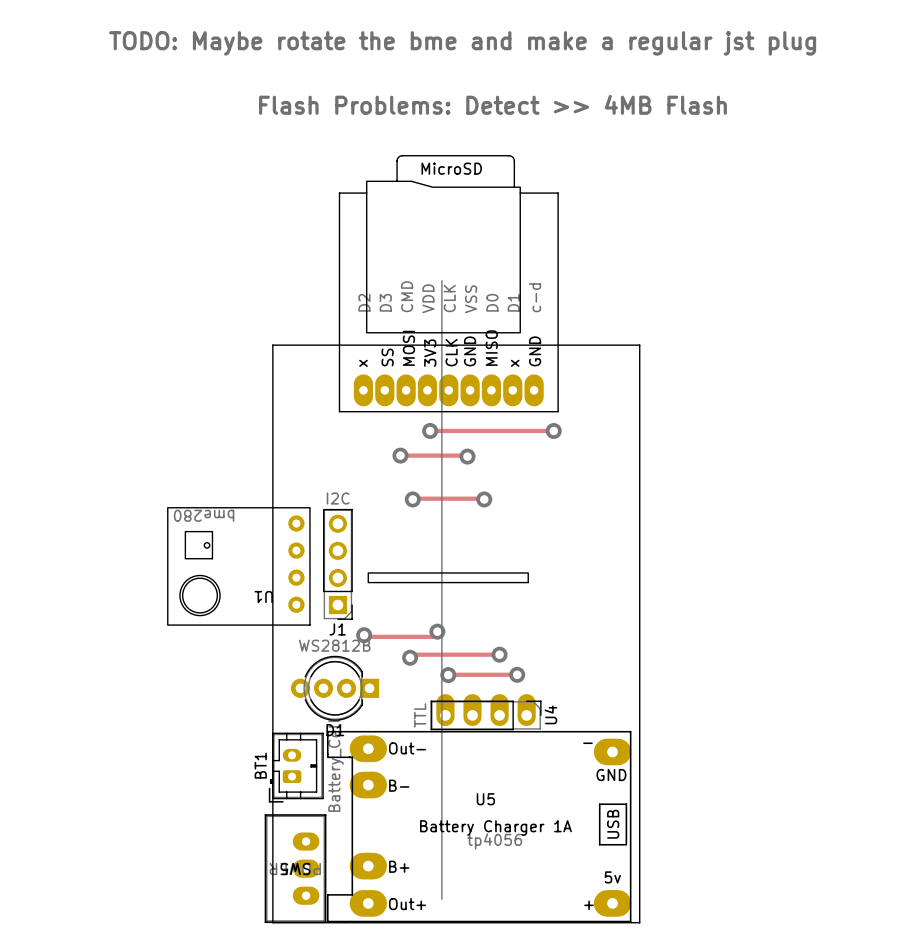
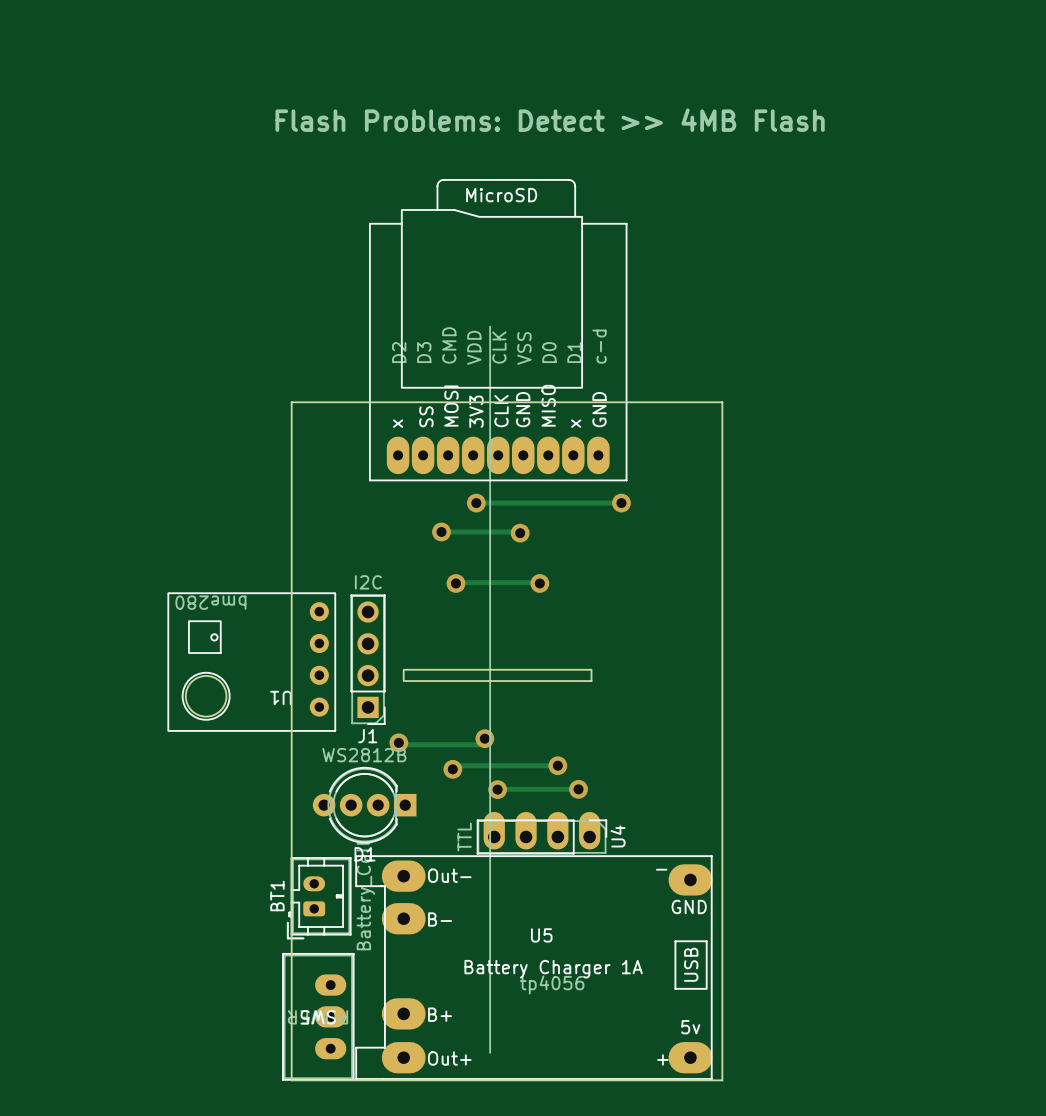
text: TODO: Maybe rotate the bme and make a regular jst plug (462, 43) -> none

